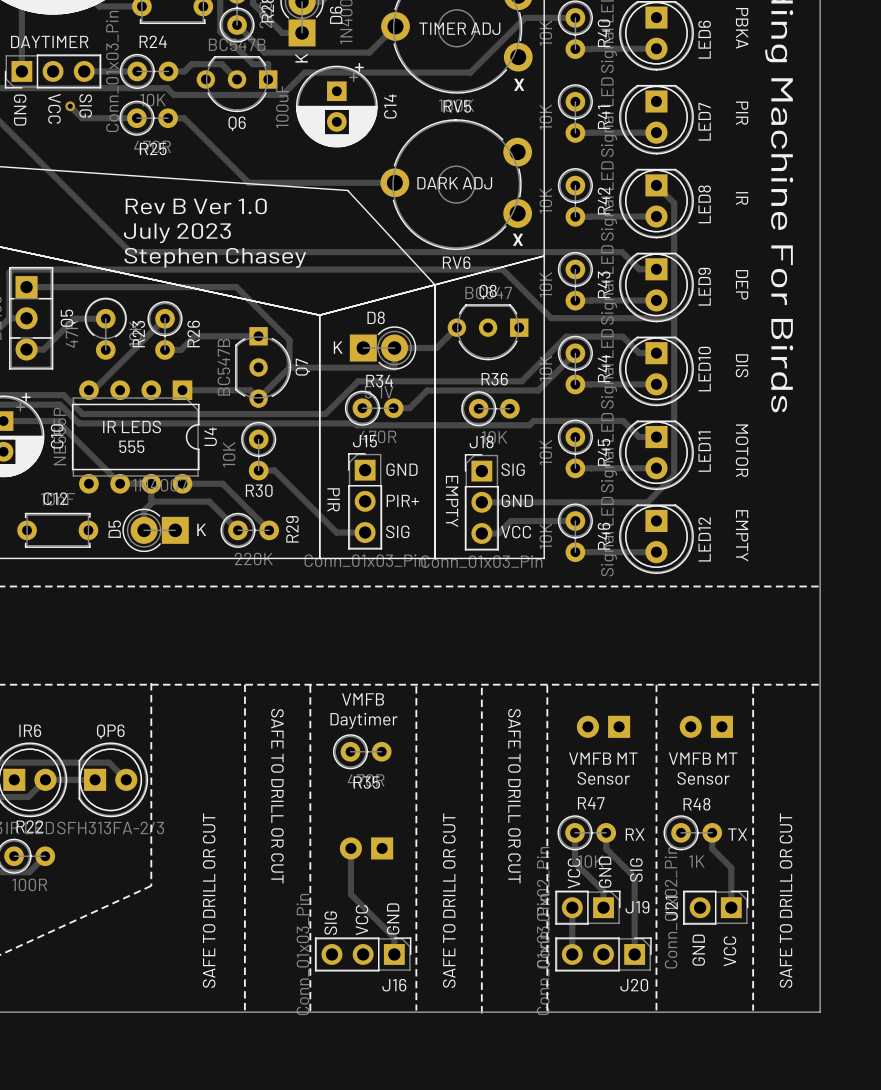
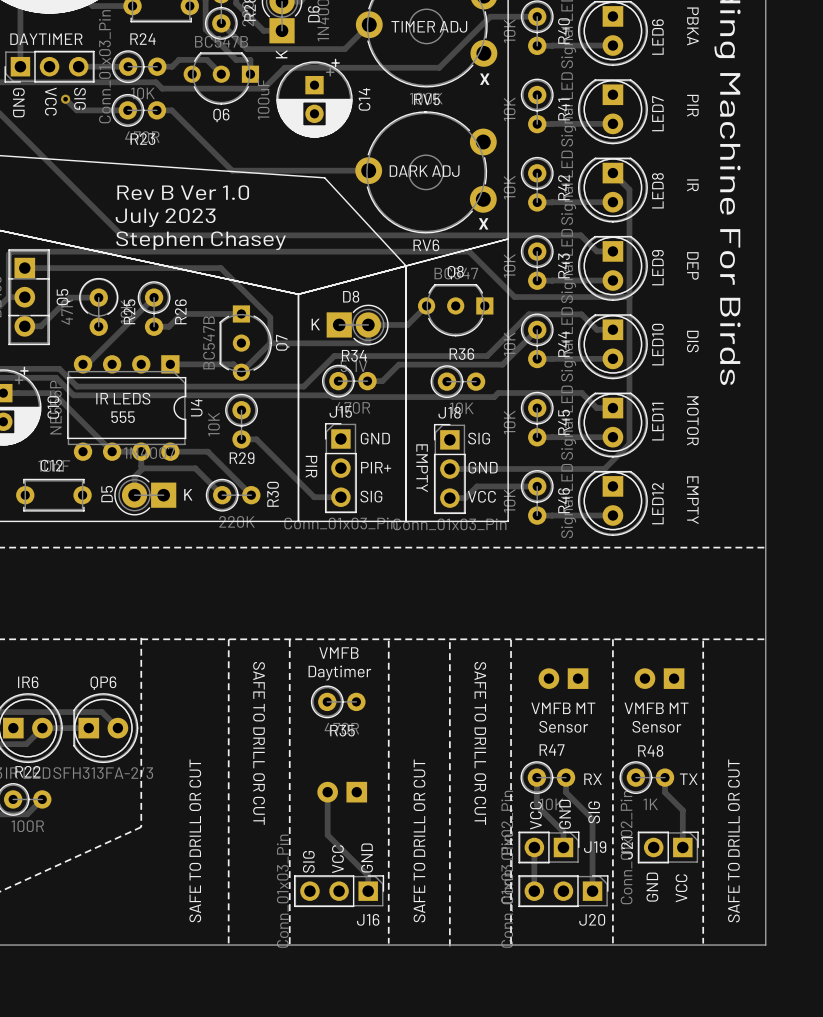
R25 name: R25 (153, 148) -> R23 (142, 139)
R23 name: R23 (138, 334) -> R25 (129, 311)
R30 name: R30 (259, 490) -> R29 (242, 458)
R29 name: R29 (292, 529) -> R30 (273, 494)

